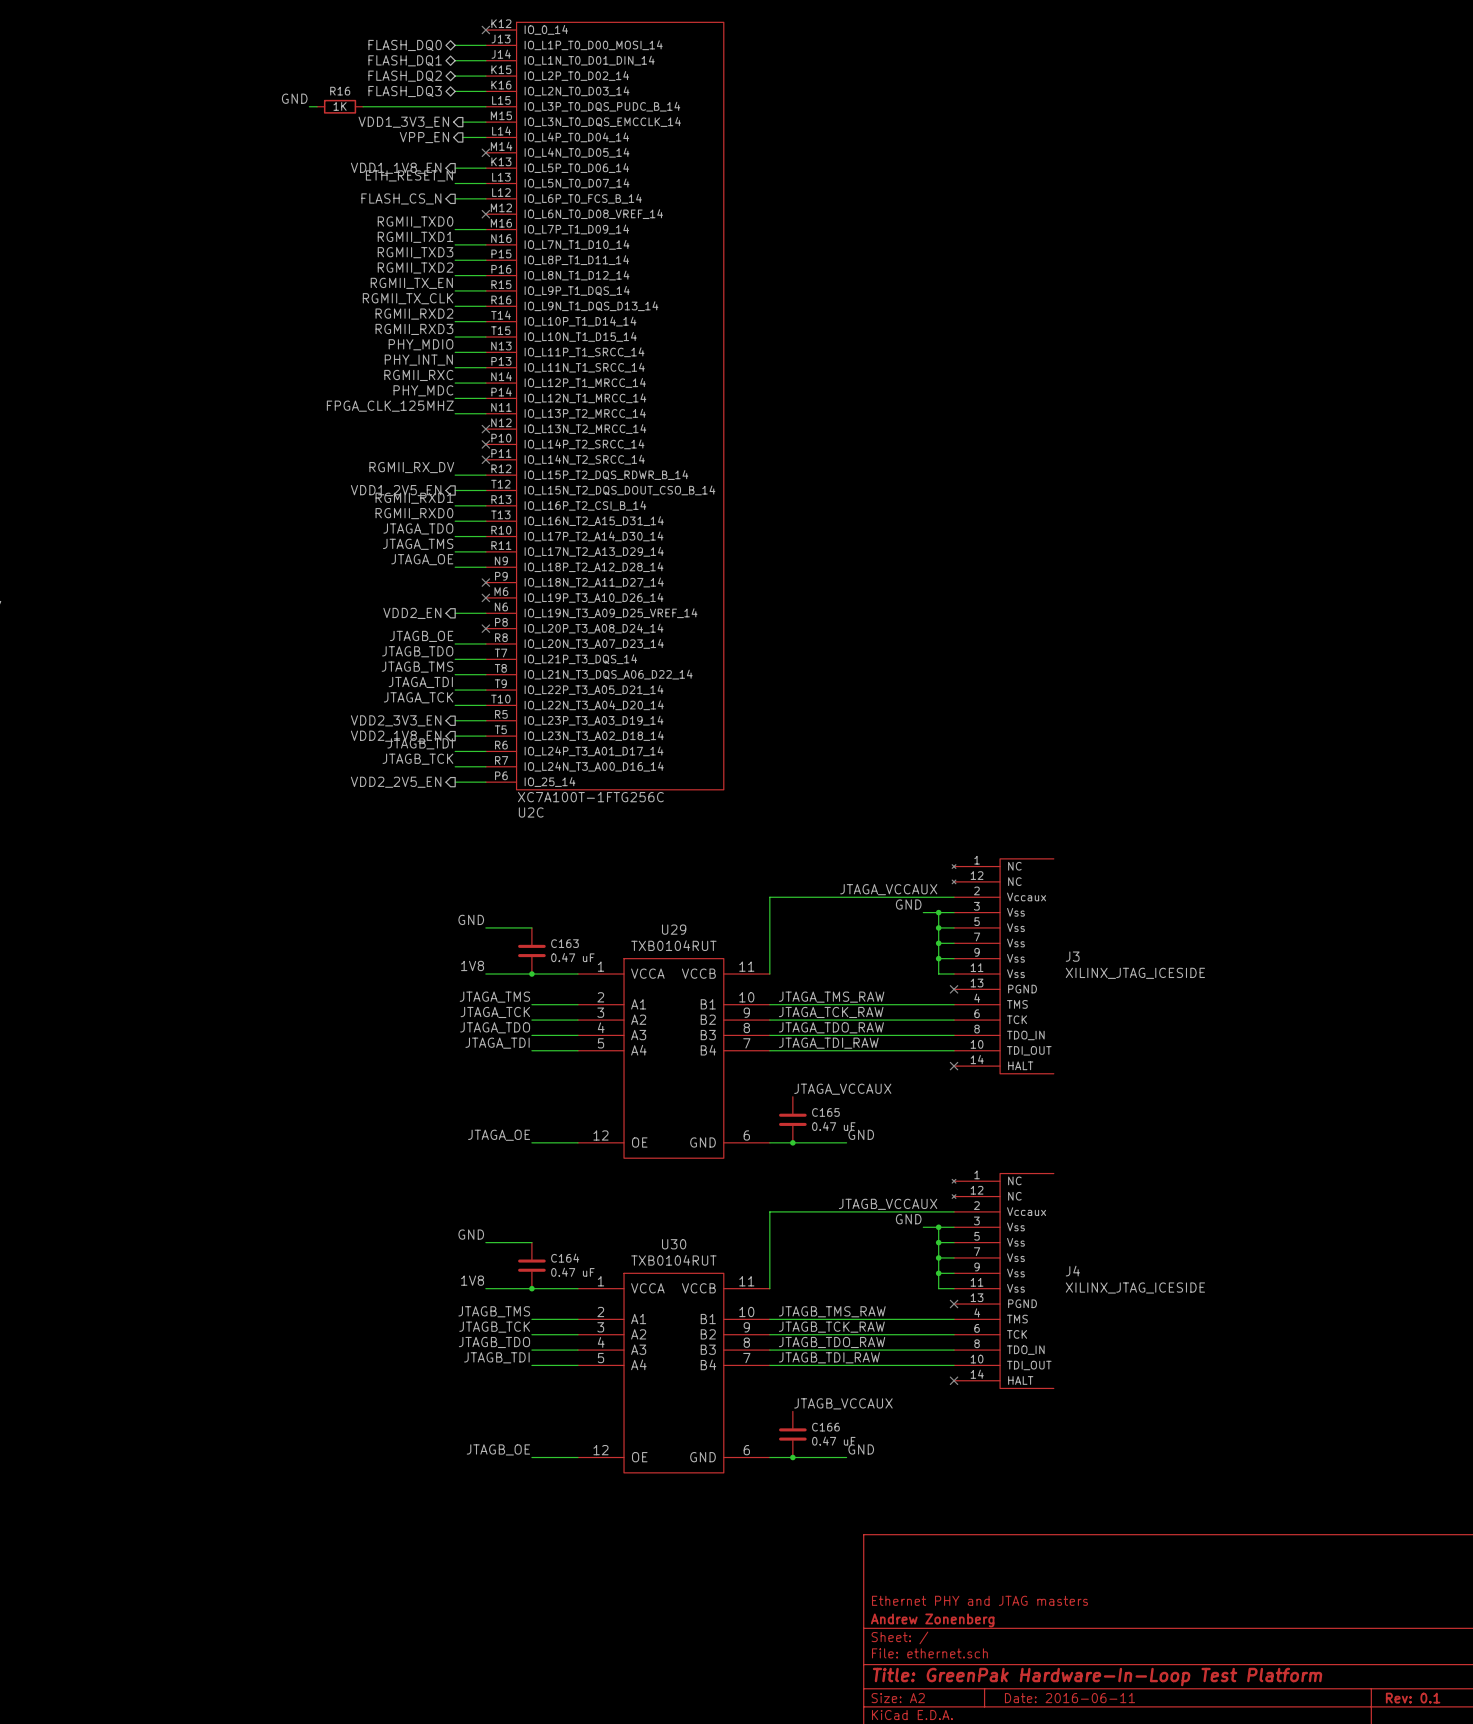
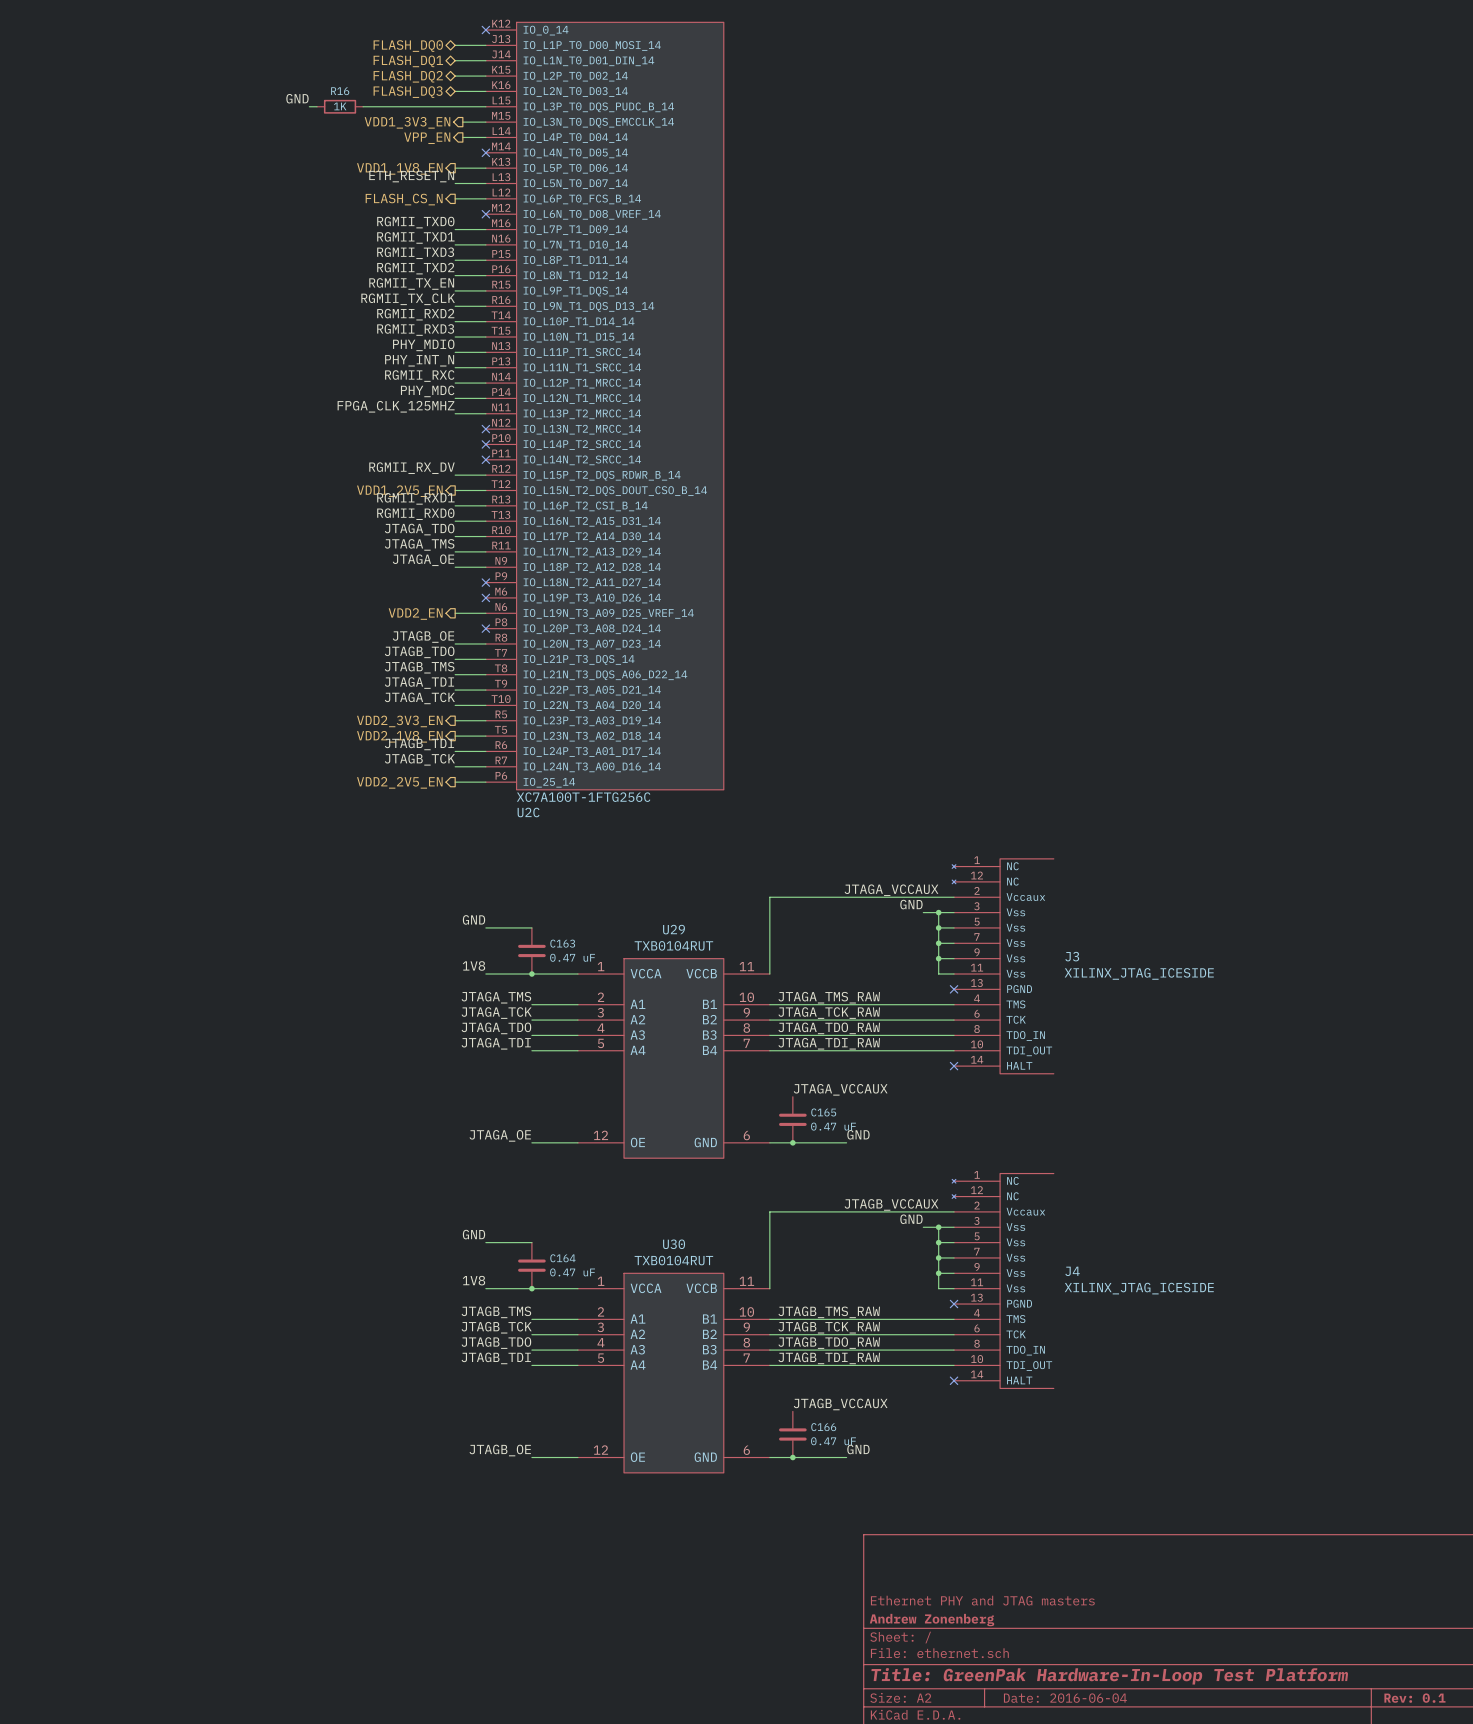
title block: Date: 2016-06-11 (1070, 1698) -> Date: 2016-06-04 (1065, 1698)

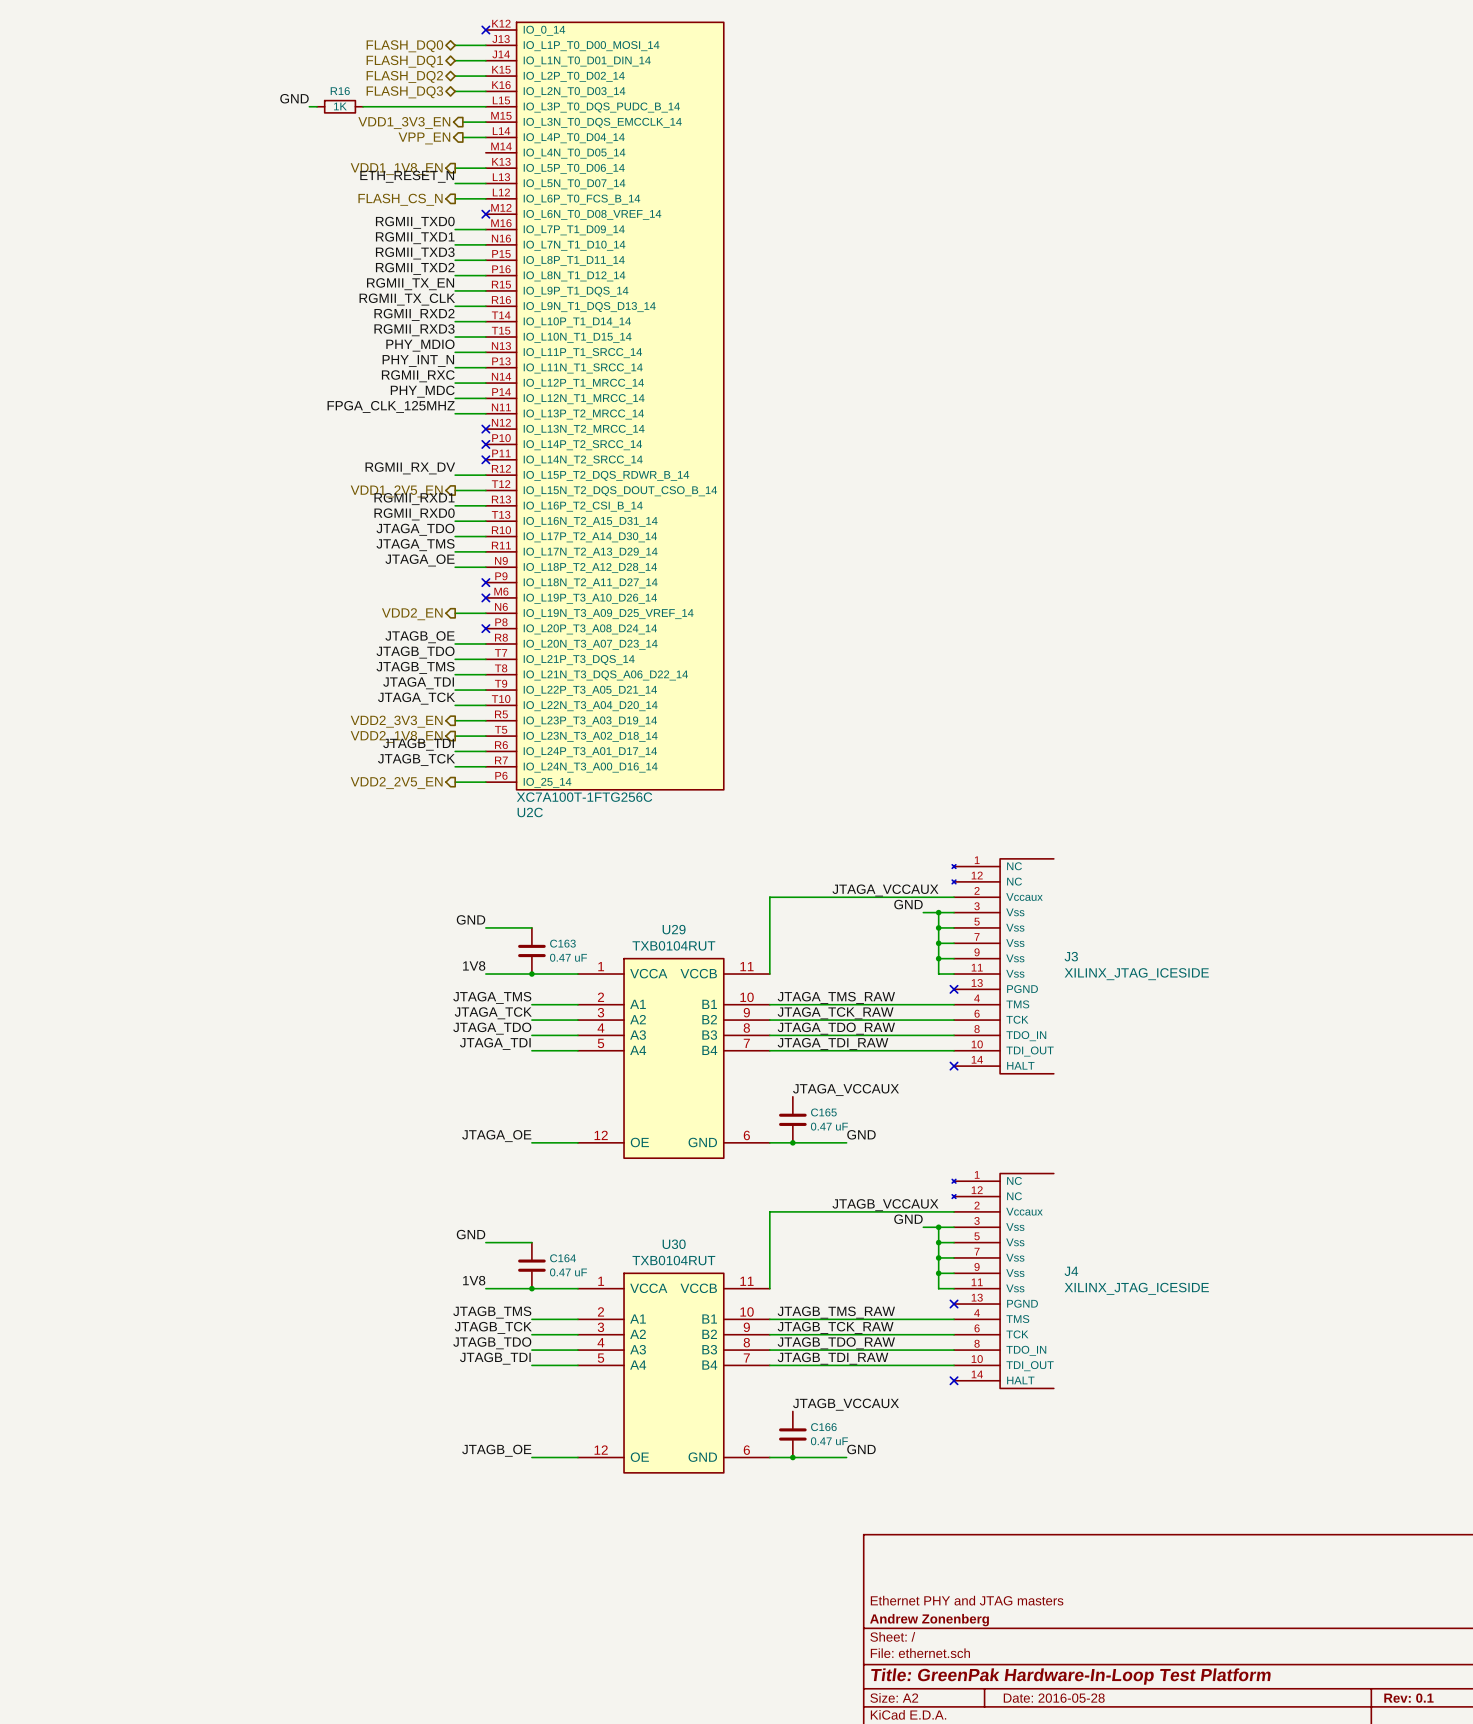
no-connect mark: (485, 152) -> none
title block: Date: 2016-06-04 (1065, 1698) -> Date: 2016-05-28 (1054, 1698)

